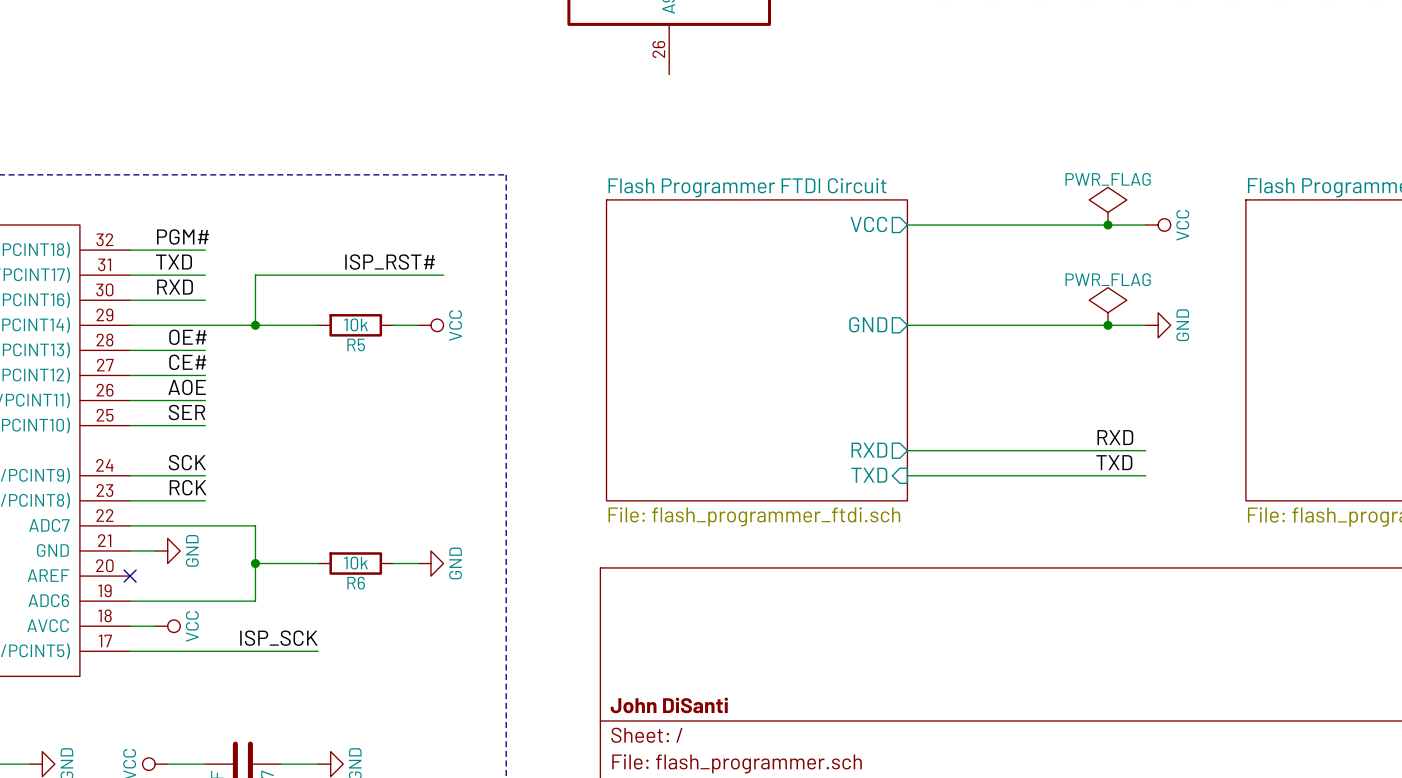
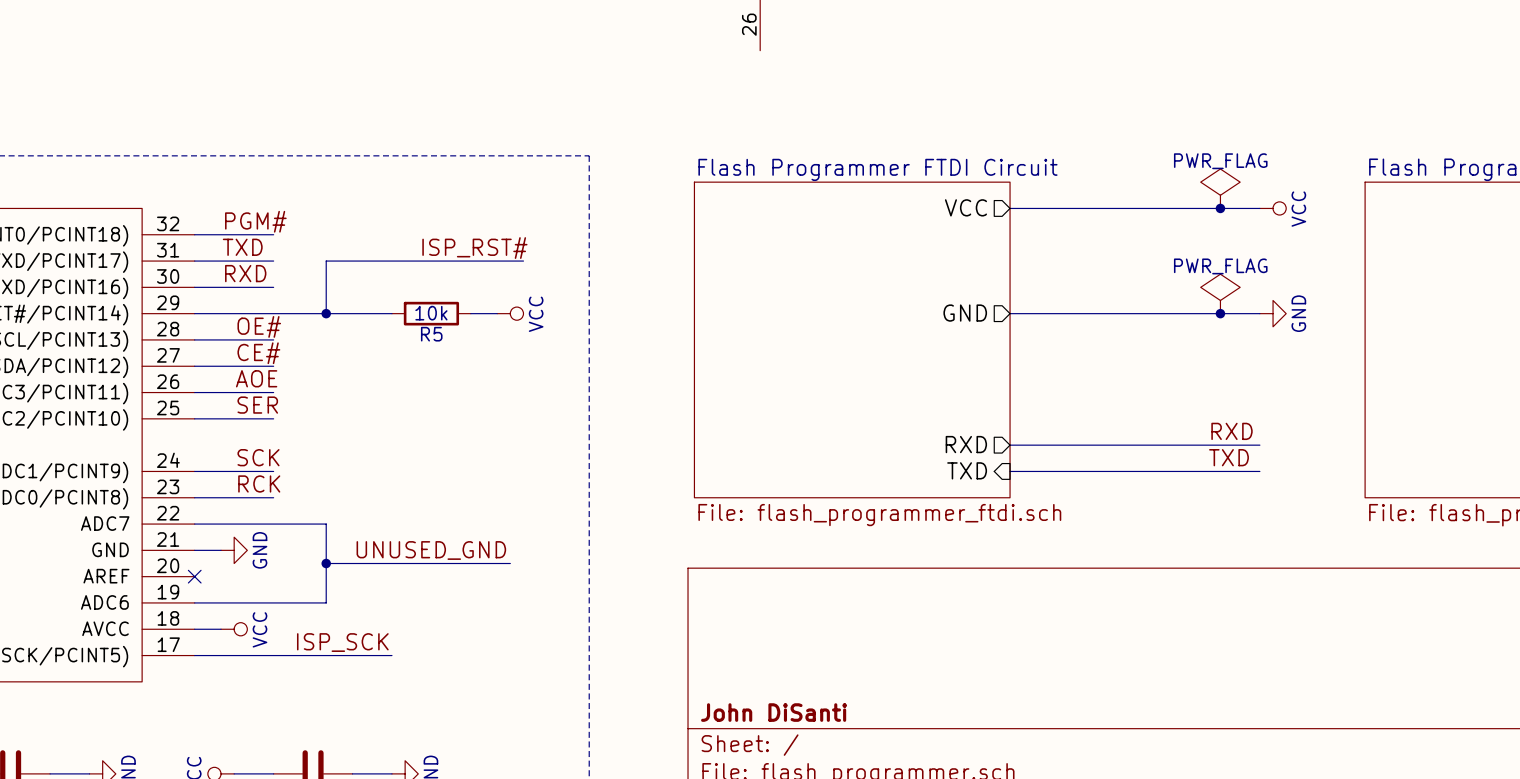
label: none -> UNUSED_GND (431, 550)
wire: none -> (391, 563) (470, 563)
R6: 10k (355, 563) -> none
power symbol: GND (430, 563) -> none

